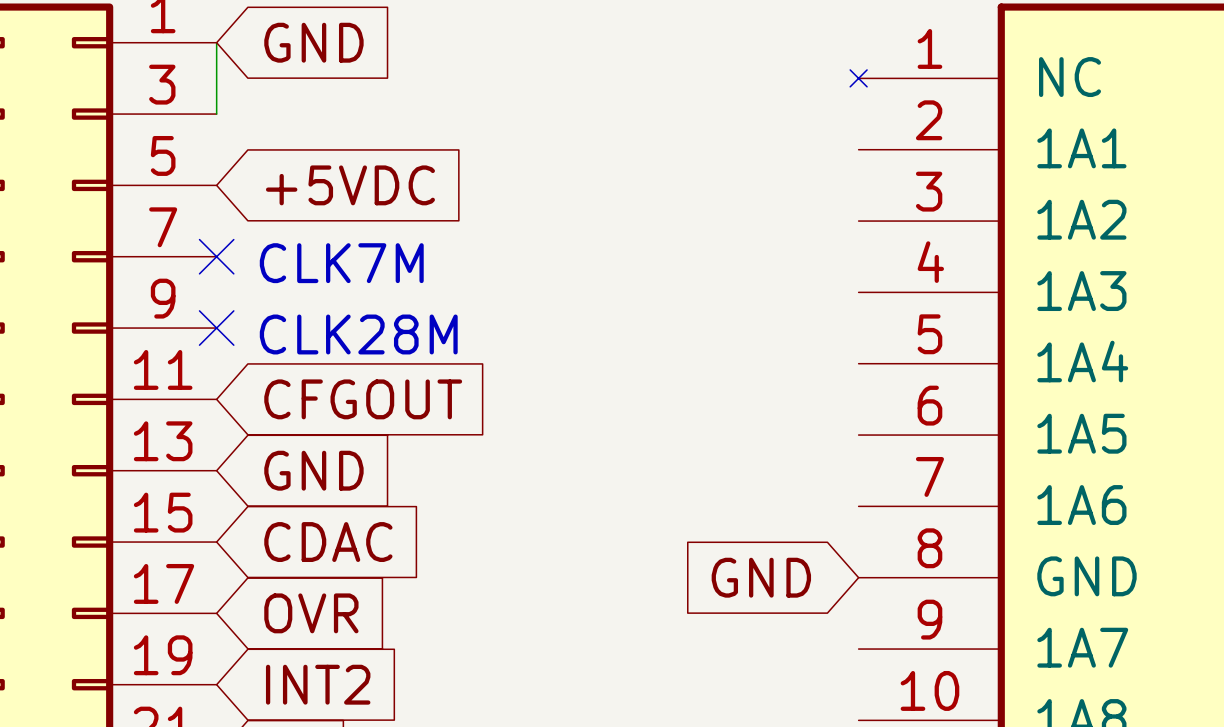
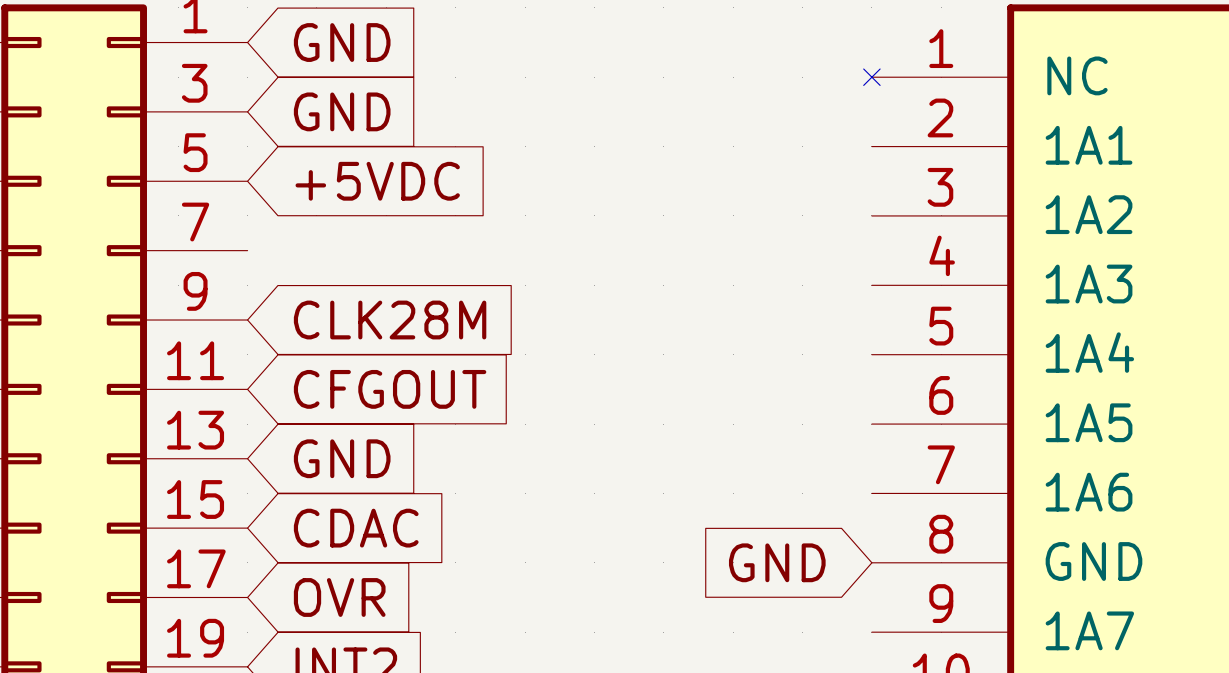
wire: (216, 42) (216, 114) -> none
global label: none -> GND (342, 111)
no-connect mark: (216, 256) -> none
text: CLK7M (341, 263) -> none
no-connect mark: (216, 328) -> none
global label: none -> CLK28M (390, 320)
text: CLK28M (358, 334) -> none

